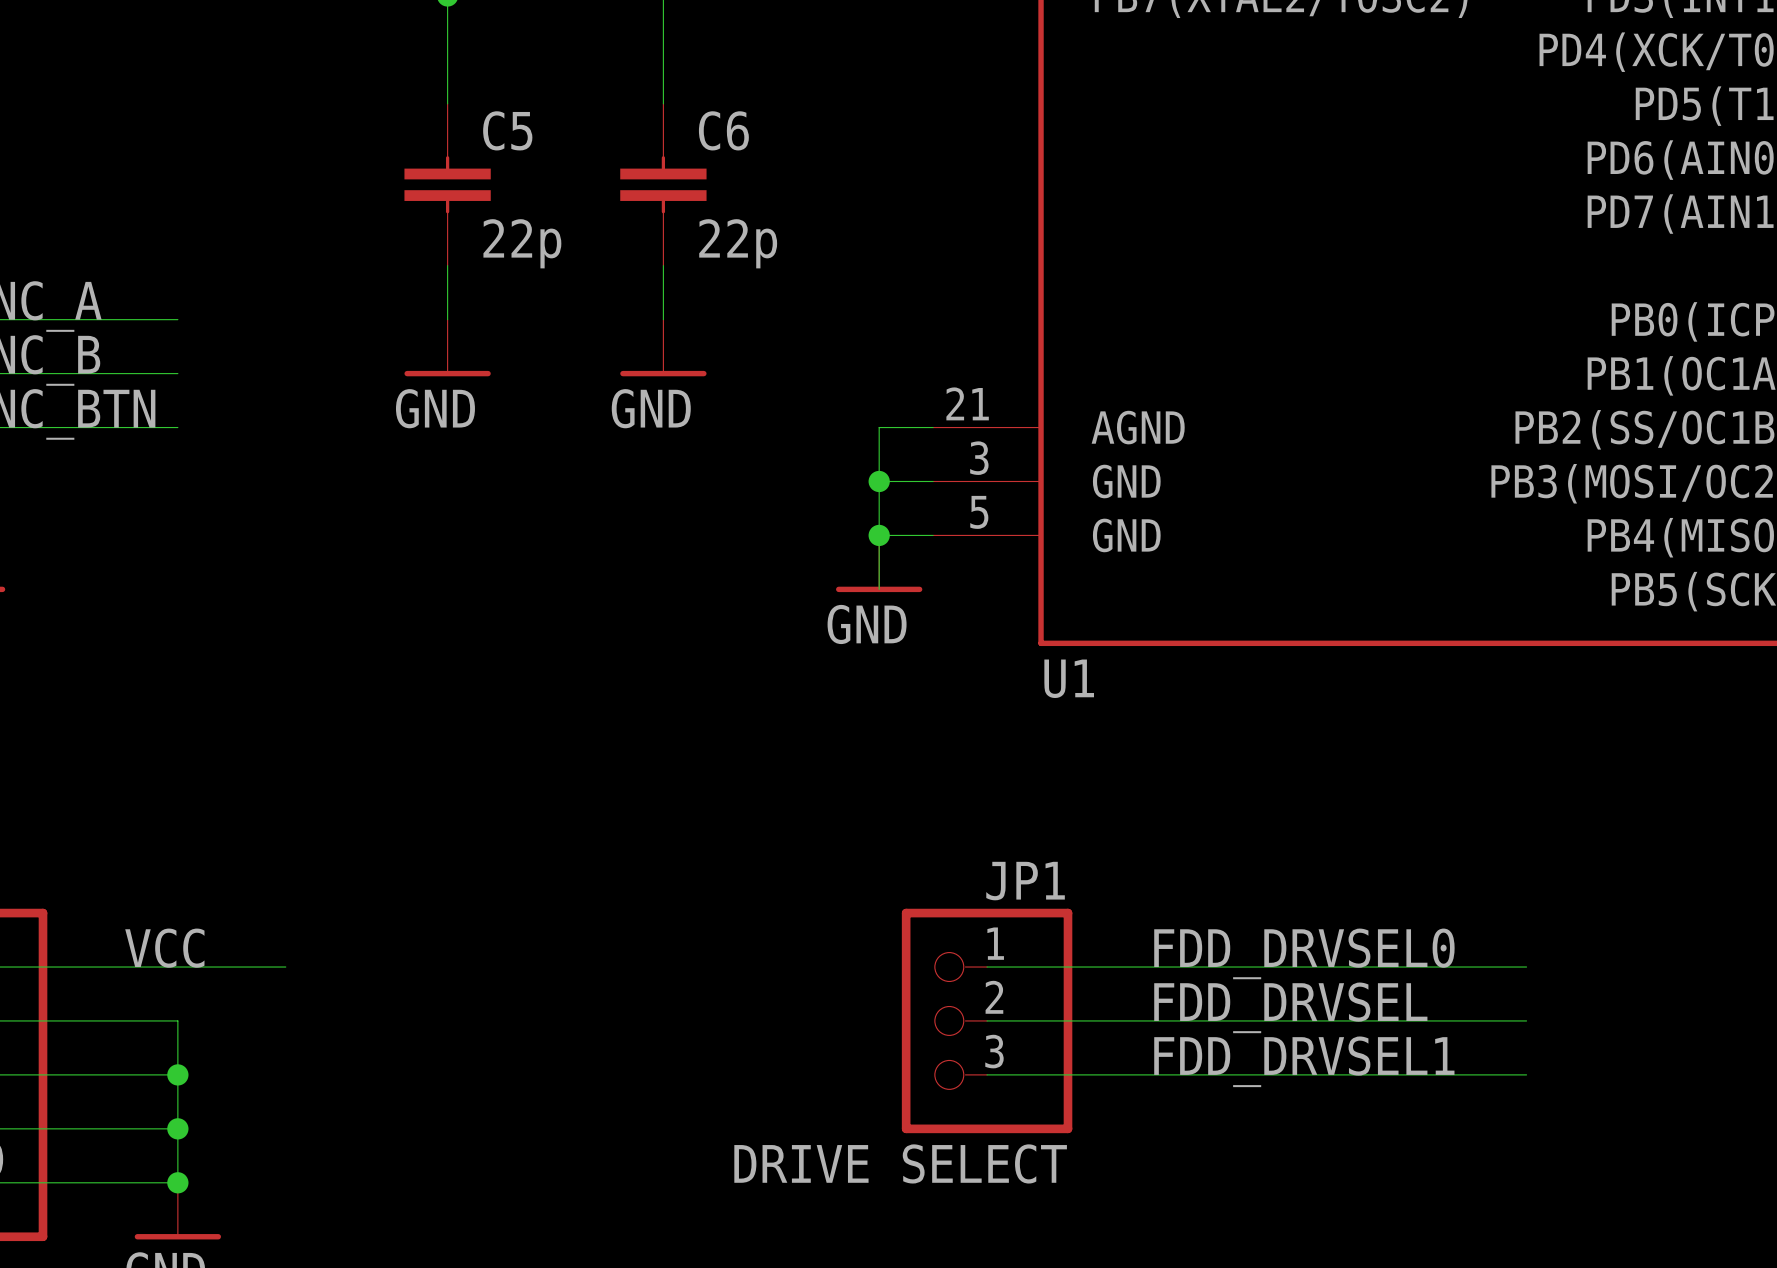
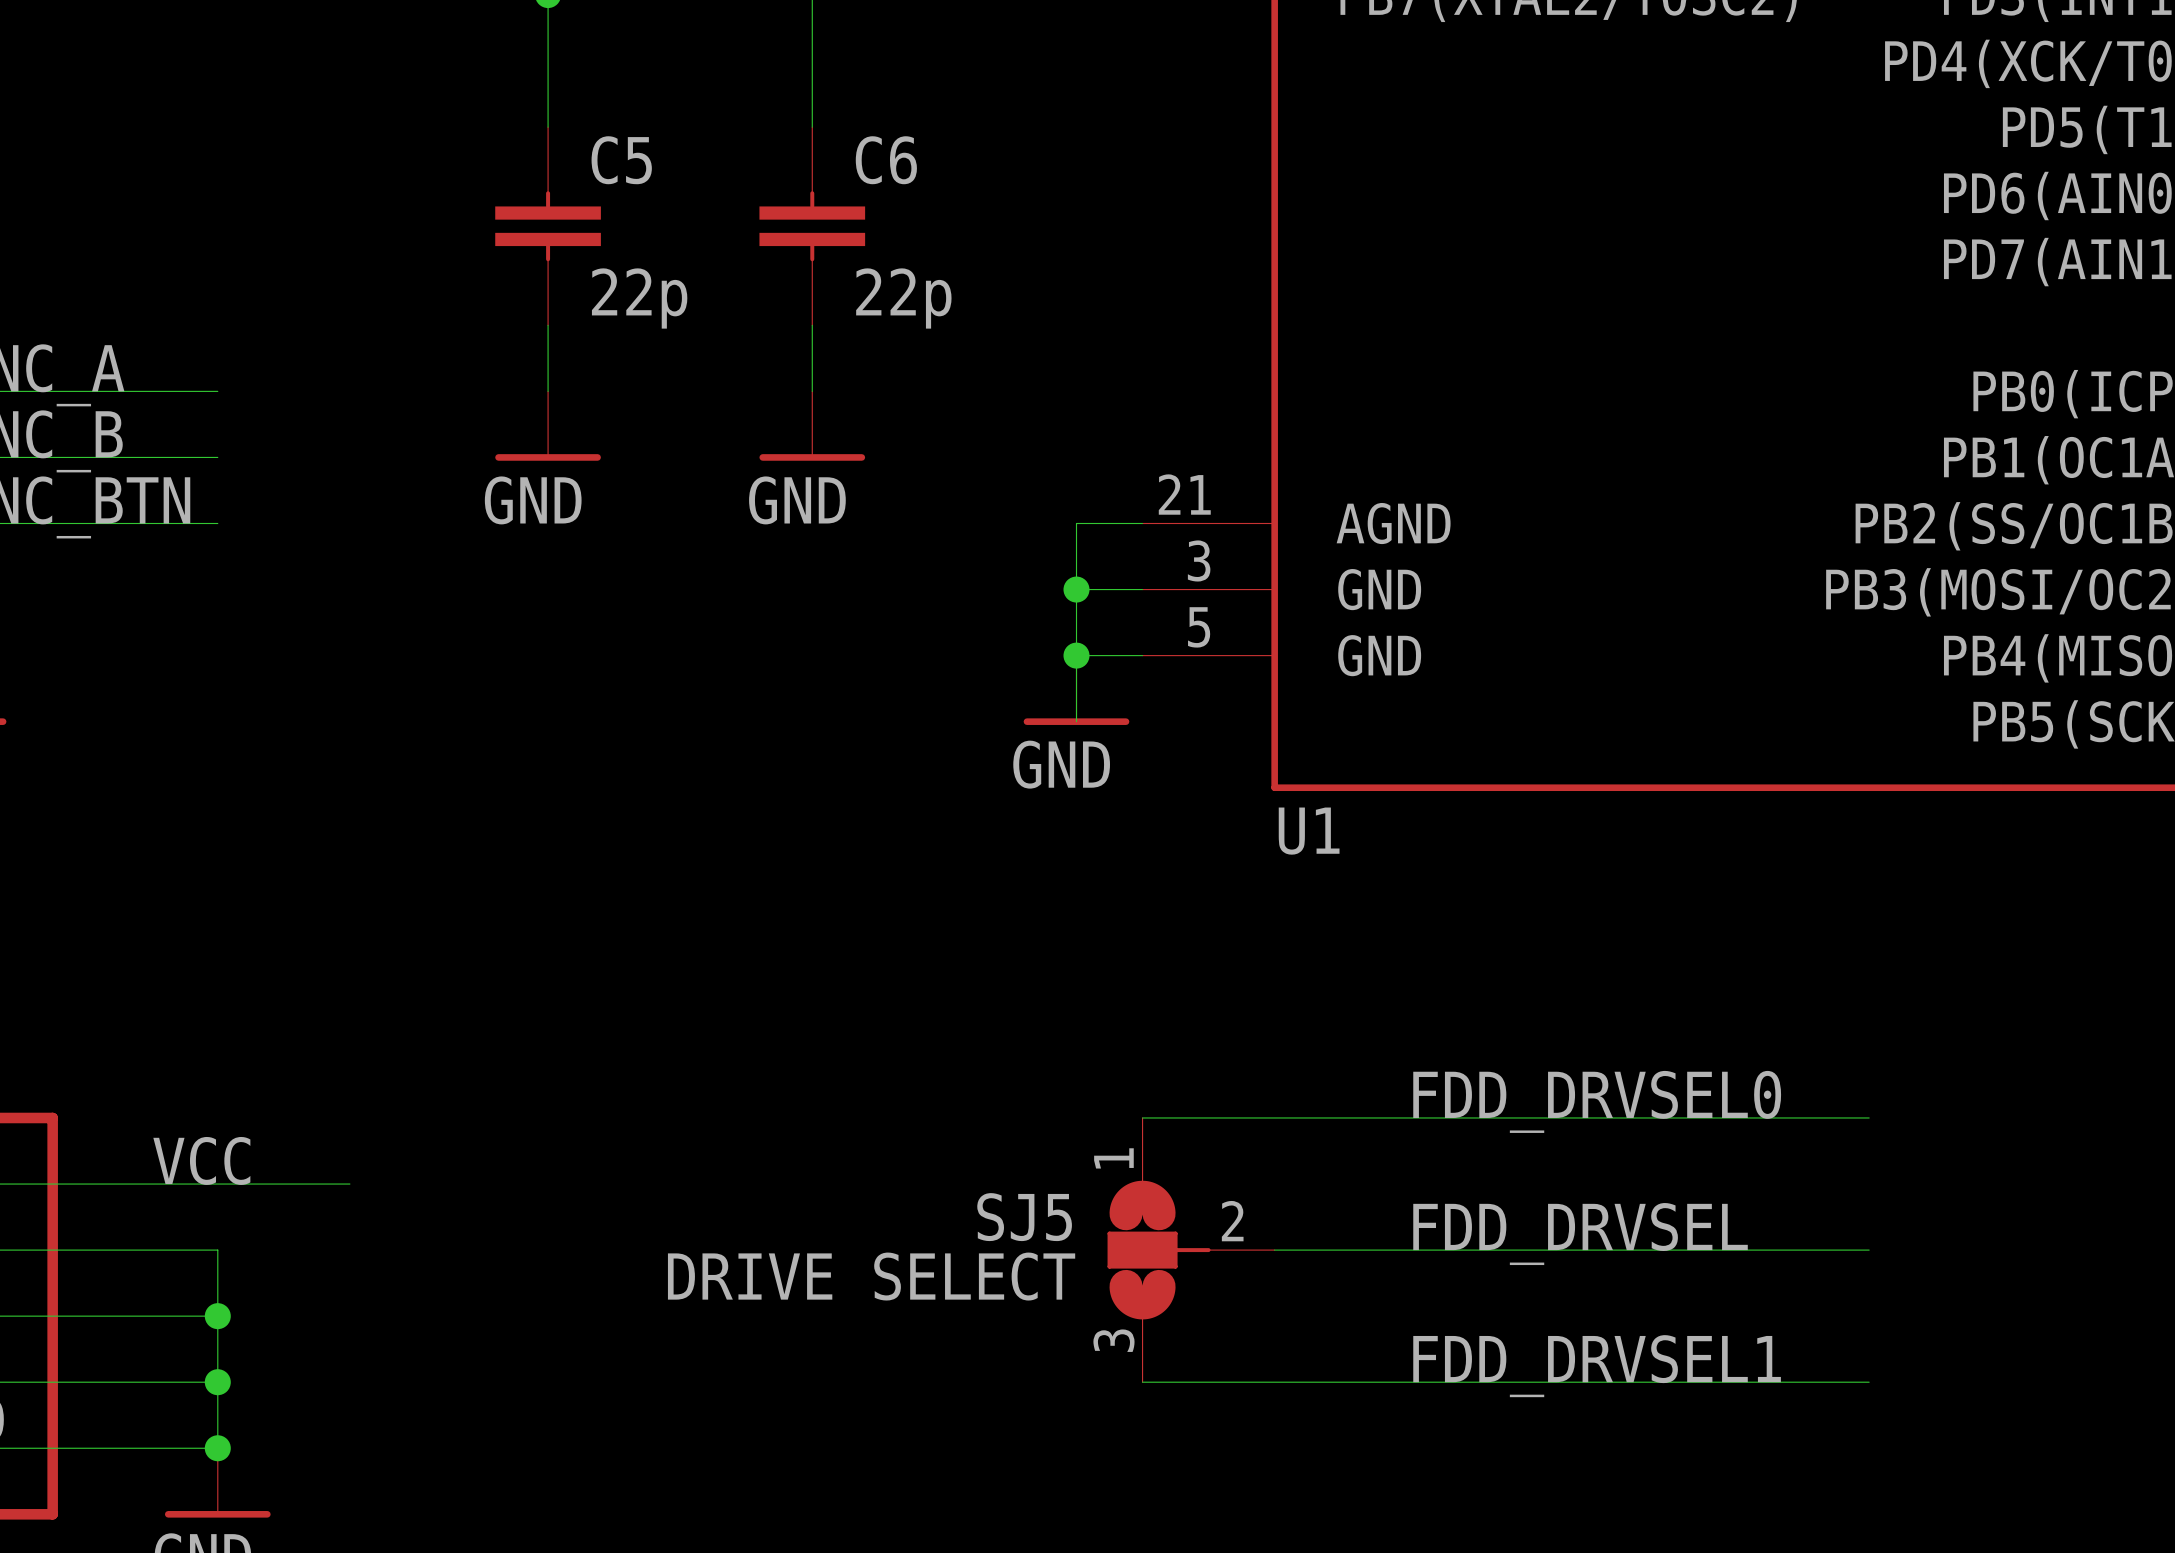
wire: none -> (1142, 1117) (1869, 1117)
label position: FDD_DRVSEL0 (1304, 953) -> FDD_DRVSEL0 (1597, 1101)
wire: (987, 967) (1526, 967) -> none
SJ5: none -> DRIVE SELECT (1191, 1250)
JP1: DRIVE SELECT (987, 1020) -> none
label position: FDD_DRVSEL1 (1304, 1061) -> FDD_DRVSEL1 (1597, 1366)
wire: (987, 1074) (1526, 1074) -> none
wire: none -> (1142, 1382) (1869, 1382)

